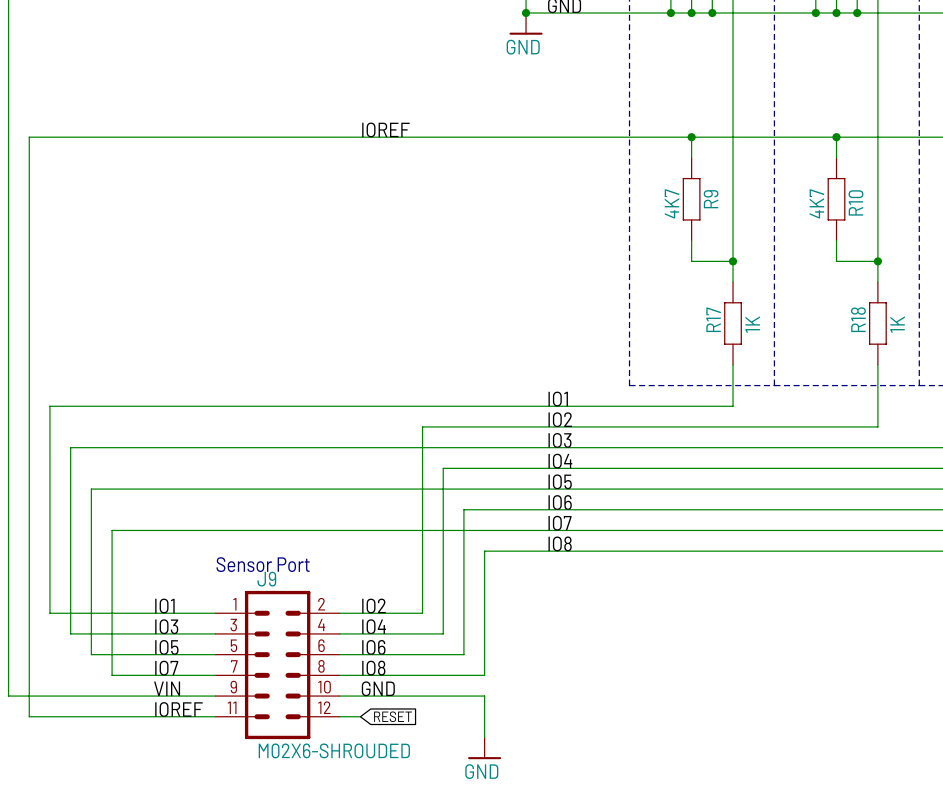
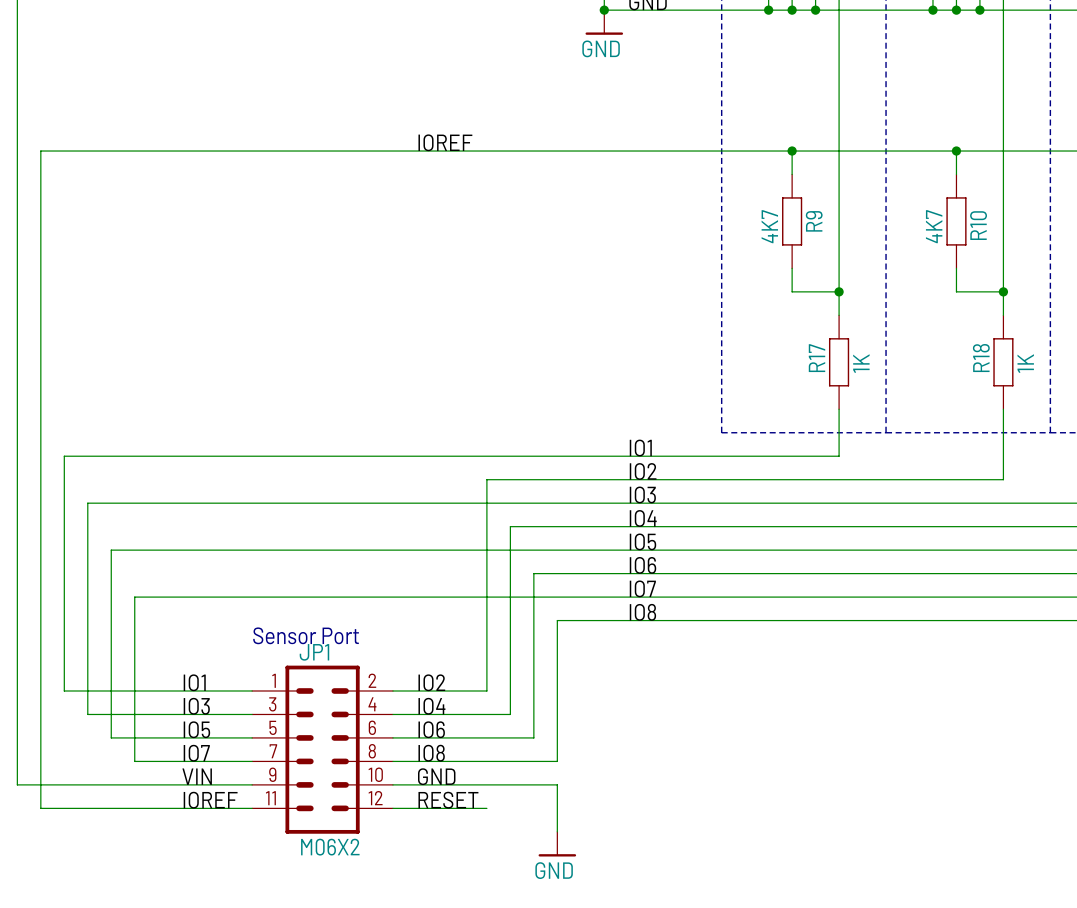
J9 name: J9 (266, 579) -> JP1 (314, 652)
label: none -> RESET (448, 800)
wire: none -> (416, 808) (486, 808)
global label: RESET (392, 716) -> none
J9 value: M02X6-SHROUDED (334, 750) -> M06X2 (330, 847)

